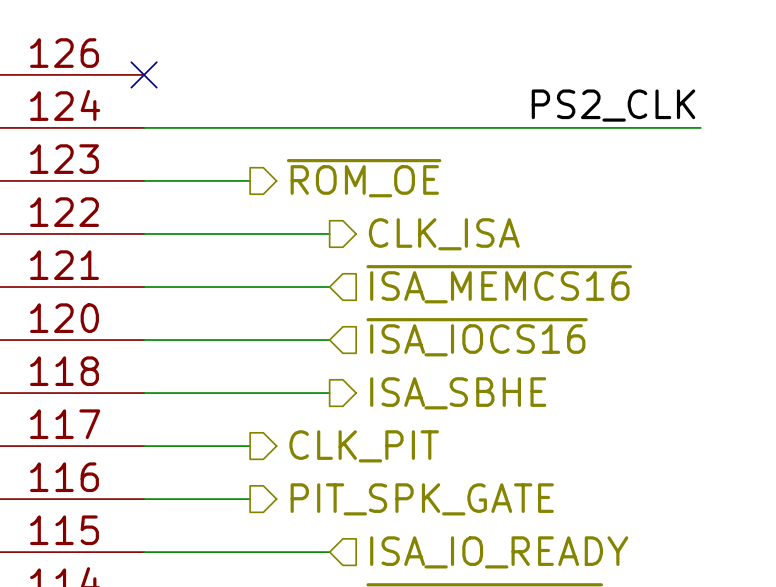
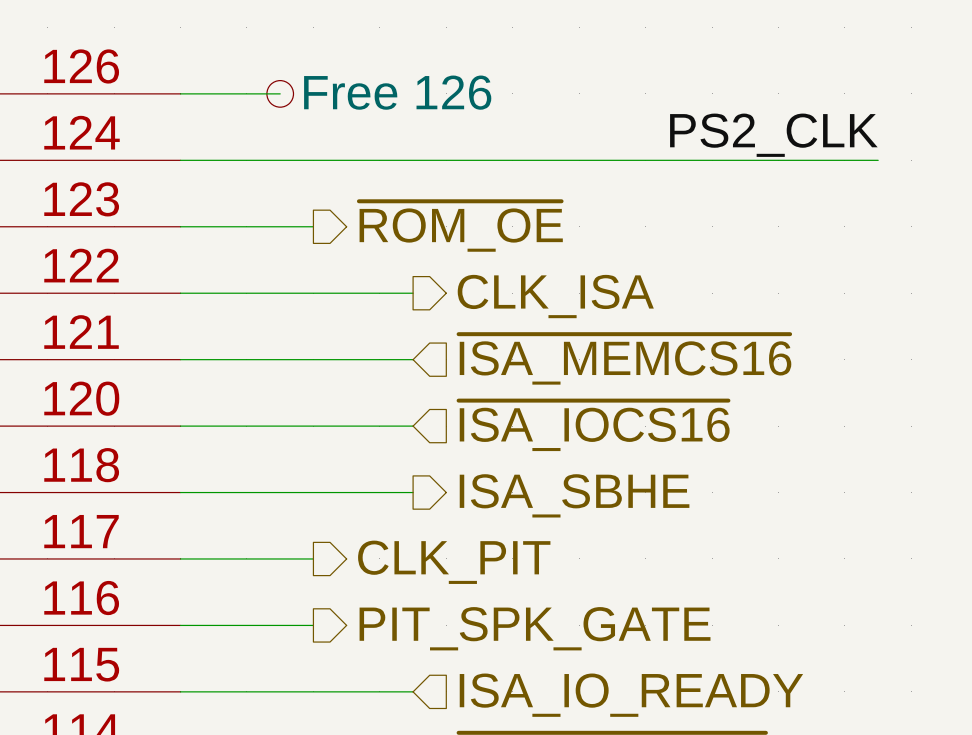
wire: none -> (180, 93) (280, 93)
no-connect mark: (144, 74) -> none
part: none -> Free 126 (280, 93)

